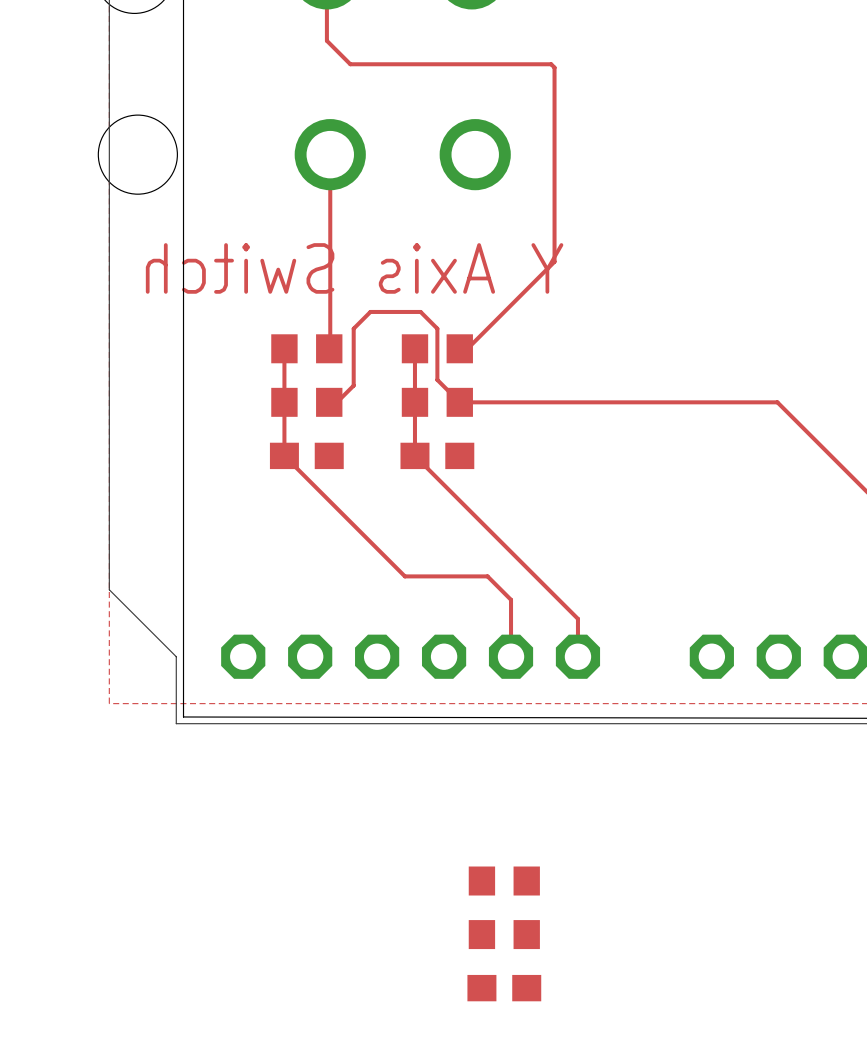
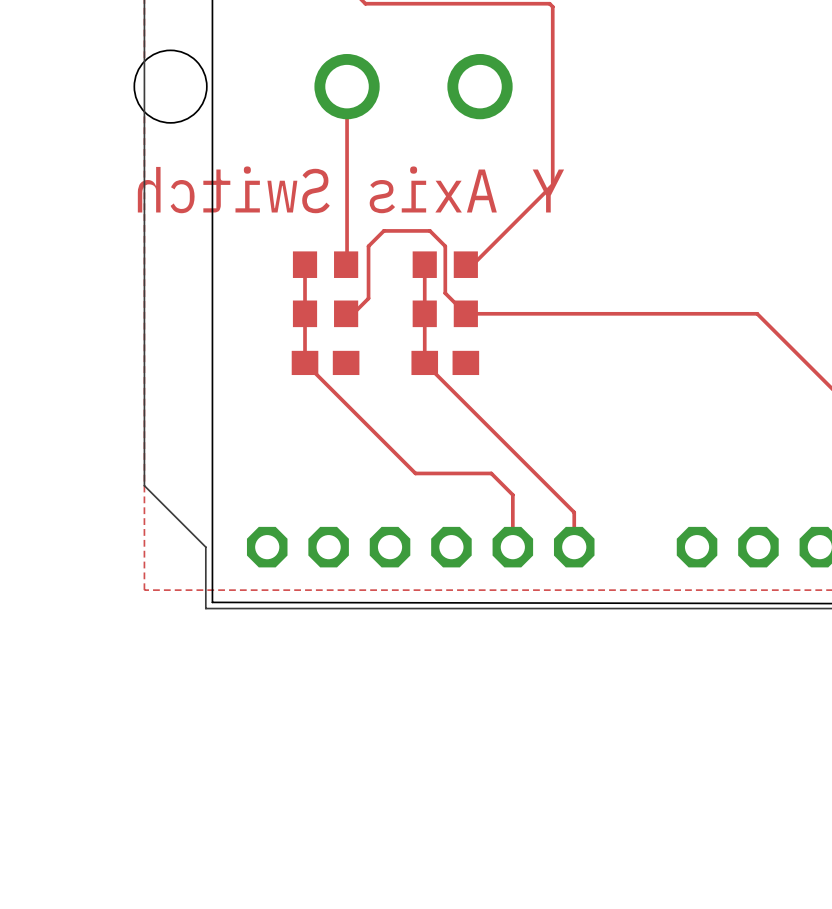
part: (504, 881) -> none
part: (504, 934) -> none
part: (504, 988) -> none

